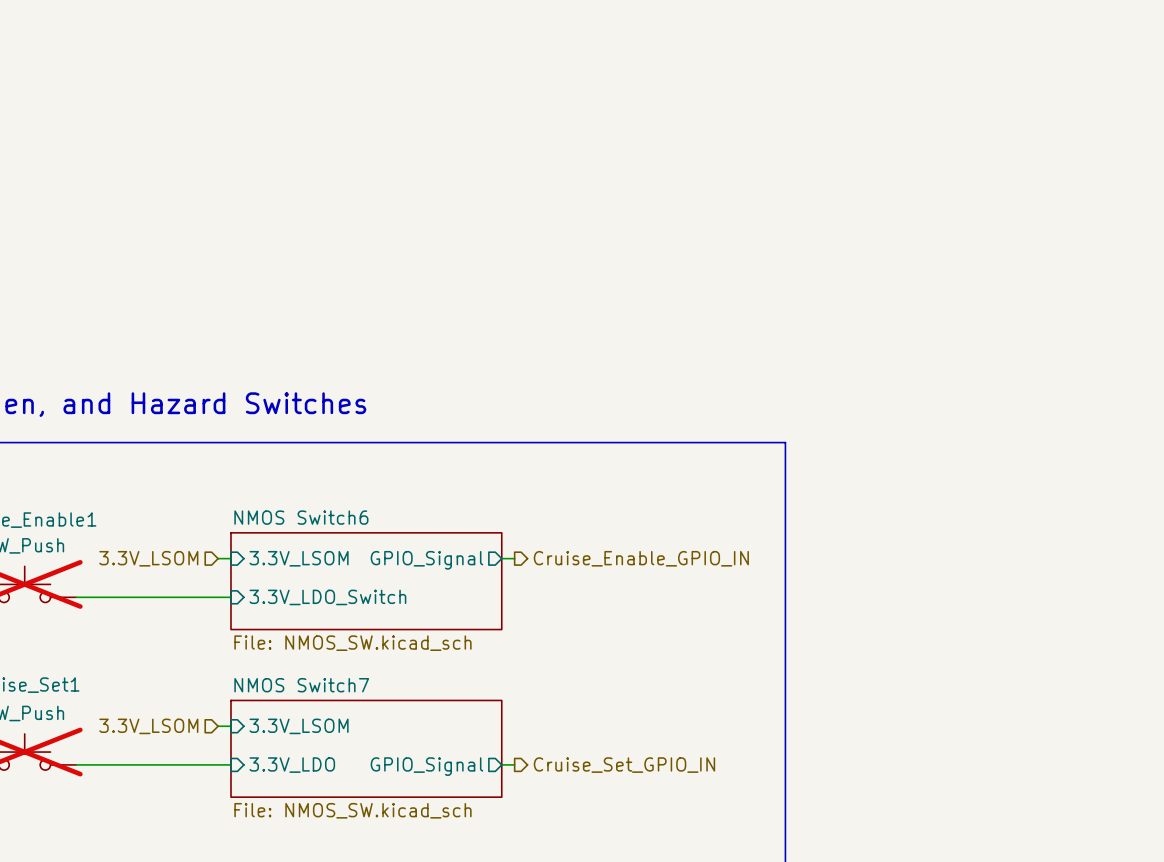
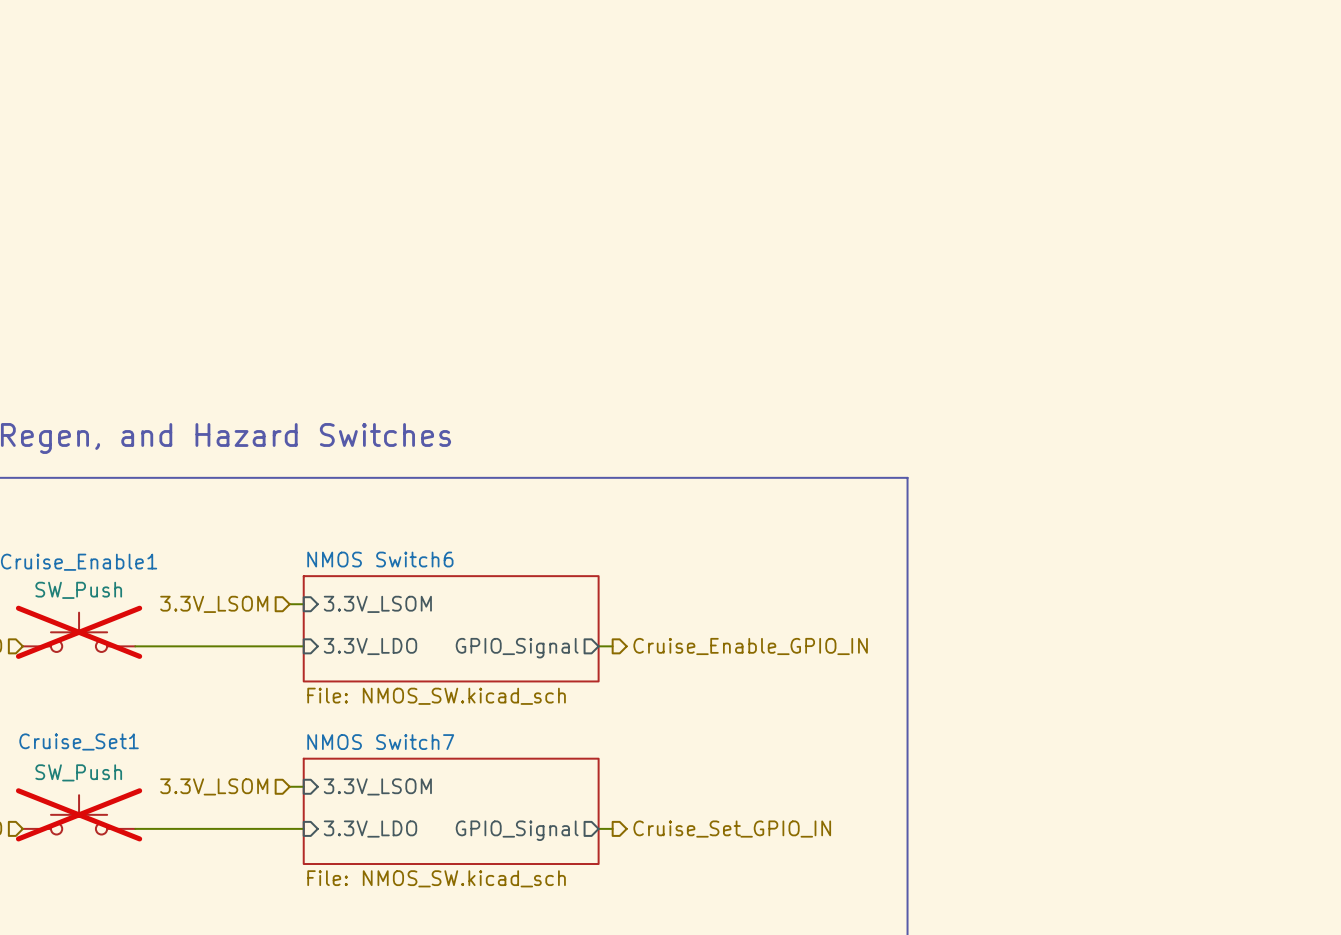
wire: (501, 558) (514, 558) -> (598, 646) (612, 646)
hierarchical label position: Cruise_Enable_GPIO_IN (641, 558) -> Cruise_Enable_GPIO_IN (750, 646)
sheet pin position: GPIO_Signal (426, 560) -> GPIO_Signal (517, 648)
sheet pin: 3.3V_LDO_Switch (327, 597) -> 3.3V_LDO (370, 646)

